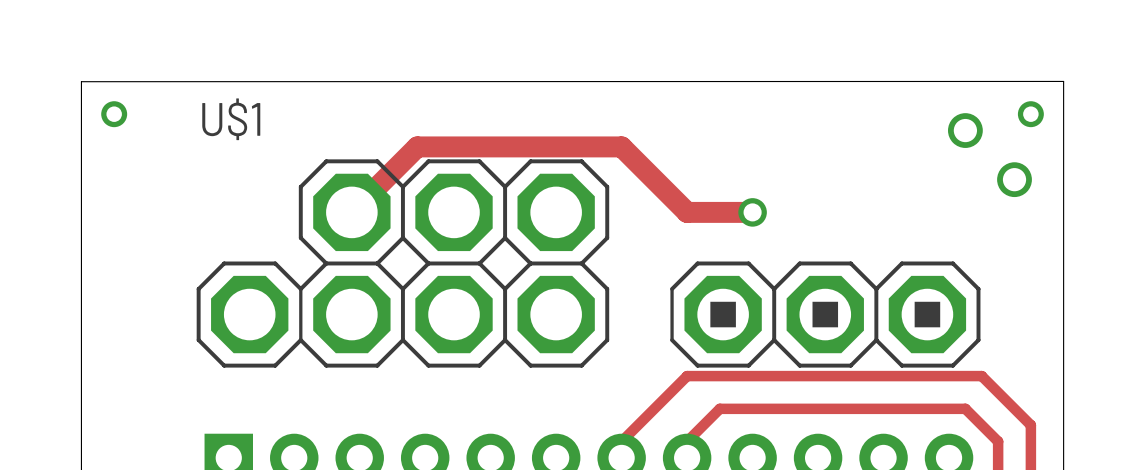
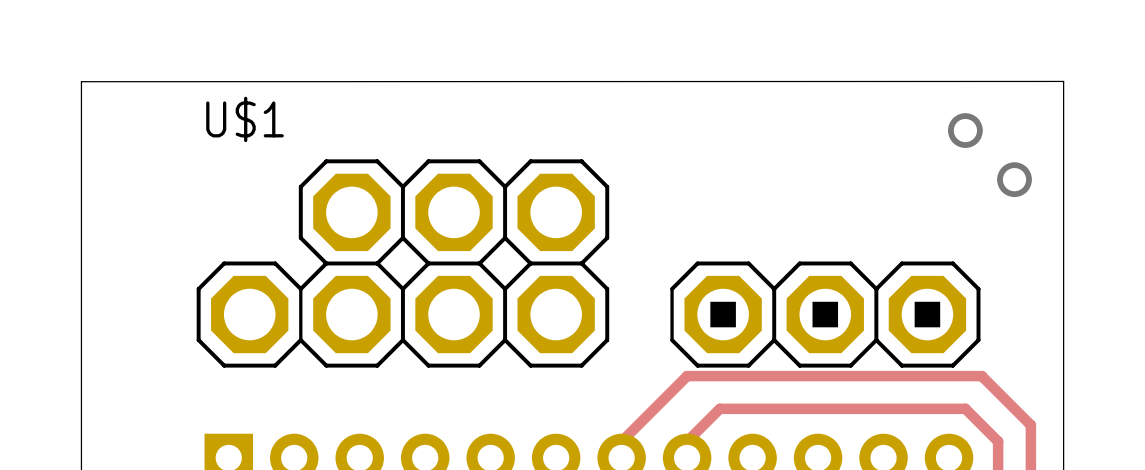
via: (114, 114) -> none
via: (1030, 114) -> none
track: (351, 212) (417, 146) (621, 146) (687, 212) (752, 212) -> none
via: (752, 212) -> none

